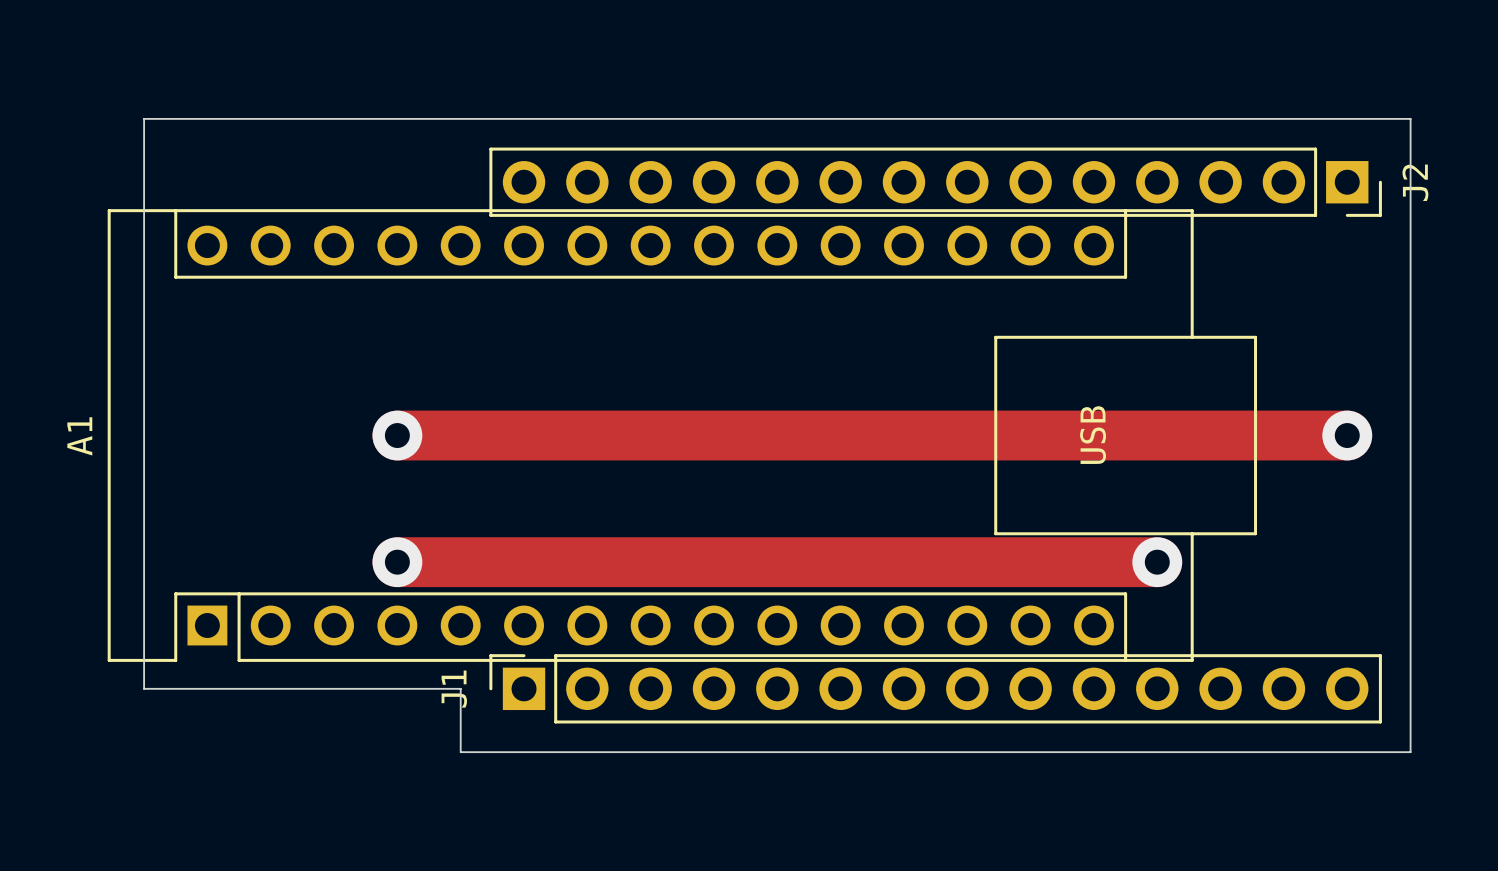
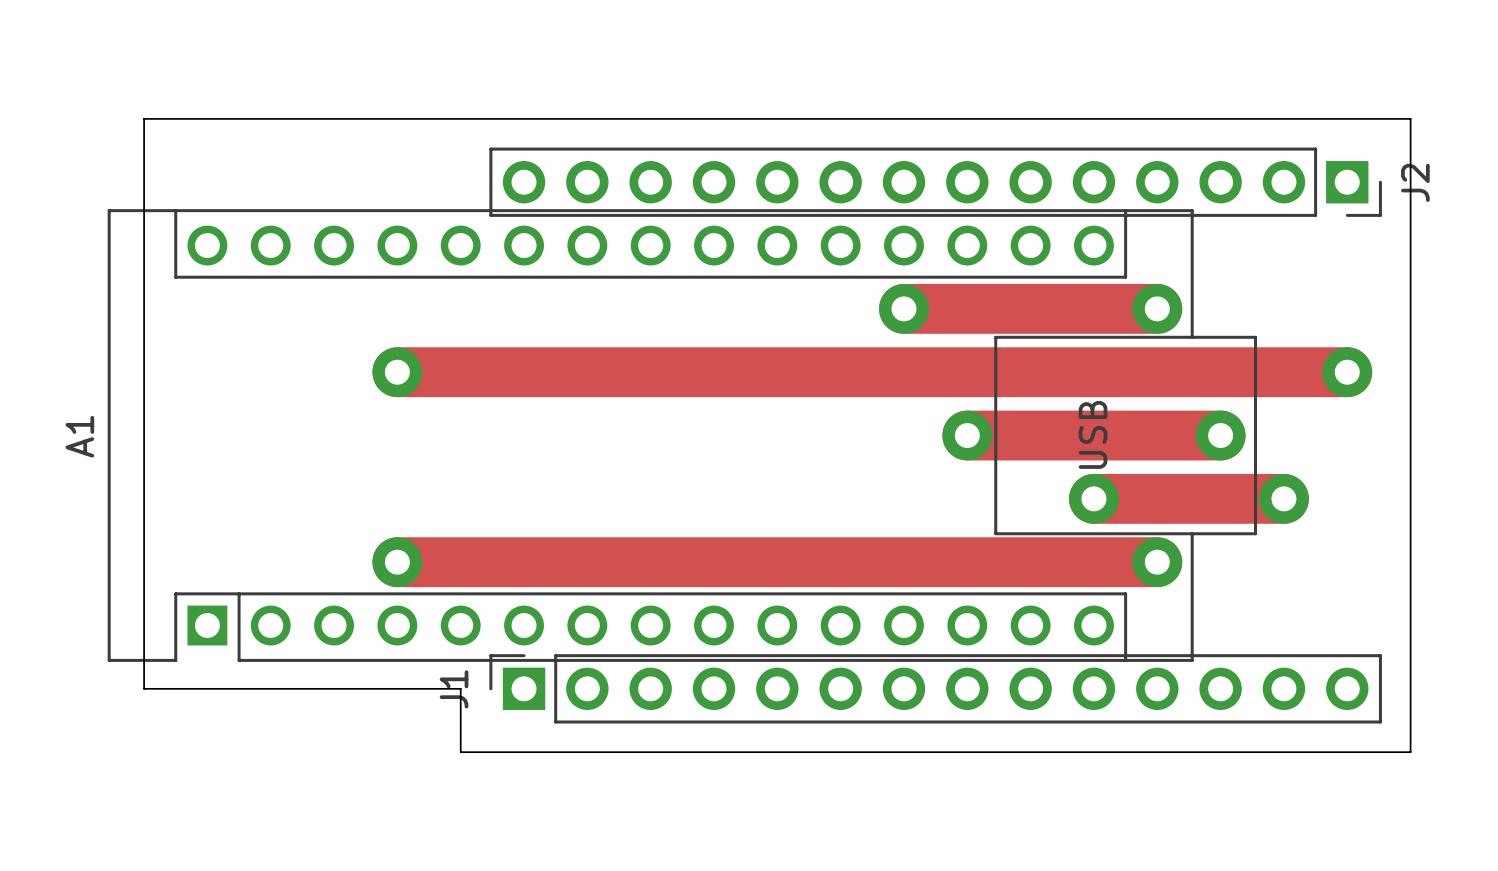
track: none -> (903, 308) (1157, 308)
via: none -> (903, 308)
via: none -> (1157, 308)
track: none -> (397, 372) (1347, 372)
via: none -> (1347, 372)
track: (397, 435) (967, 435) -> none
via position: (397, 435) -> (397, 372)
via: none -> (967, 435)
track: (1220, 435) (1347, 435) -> none
via: none -> (1220, 435)
via: (1347, 435) -> none
track: none -> (1093, 498) (1283, 498)
via: none -> (1093, 498)
via: none -> (1283, 498)

